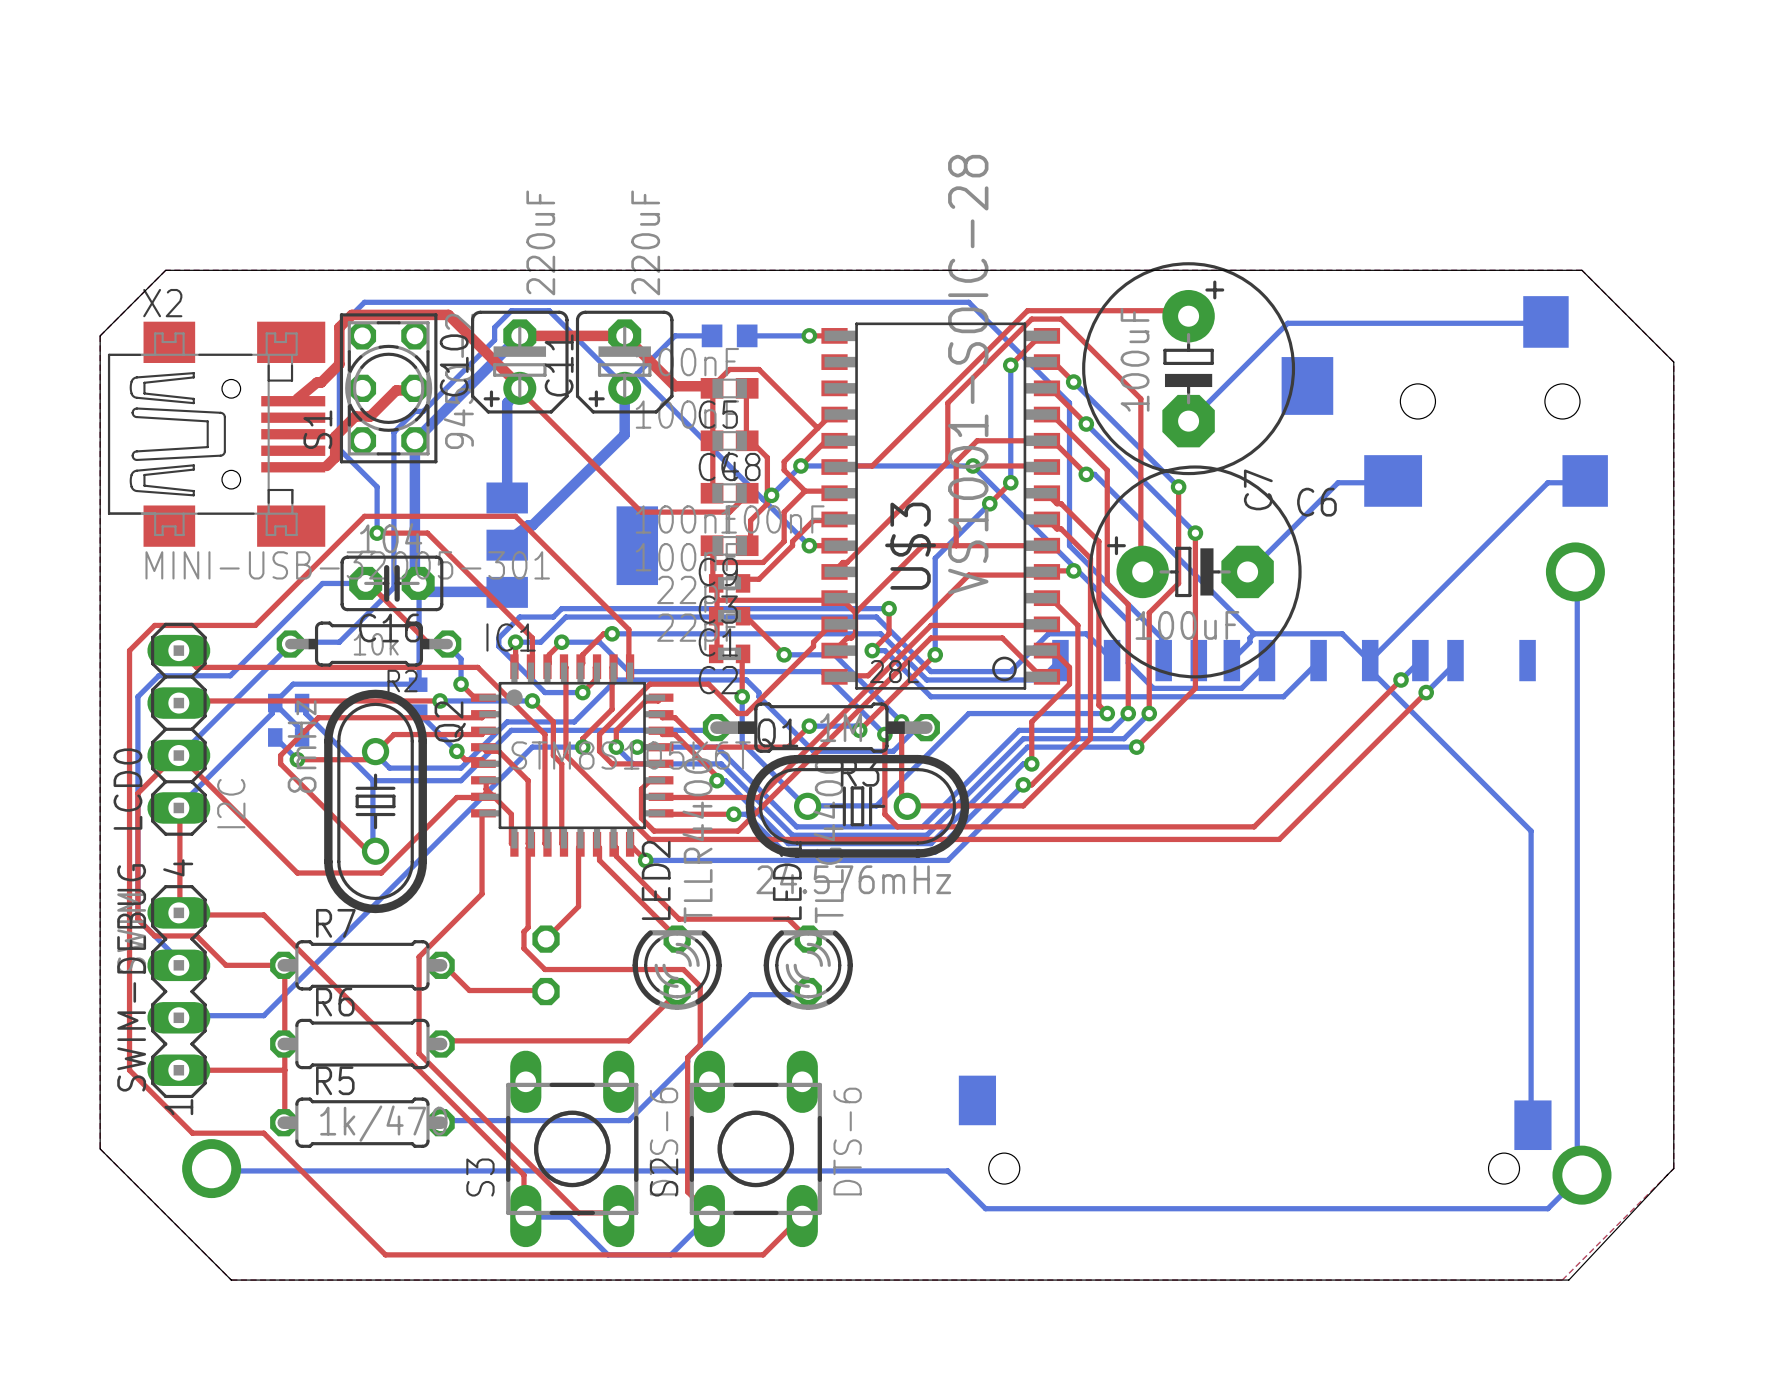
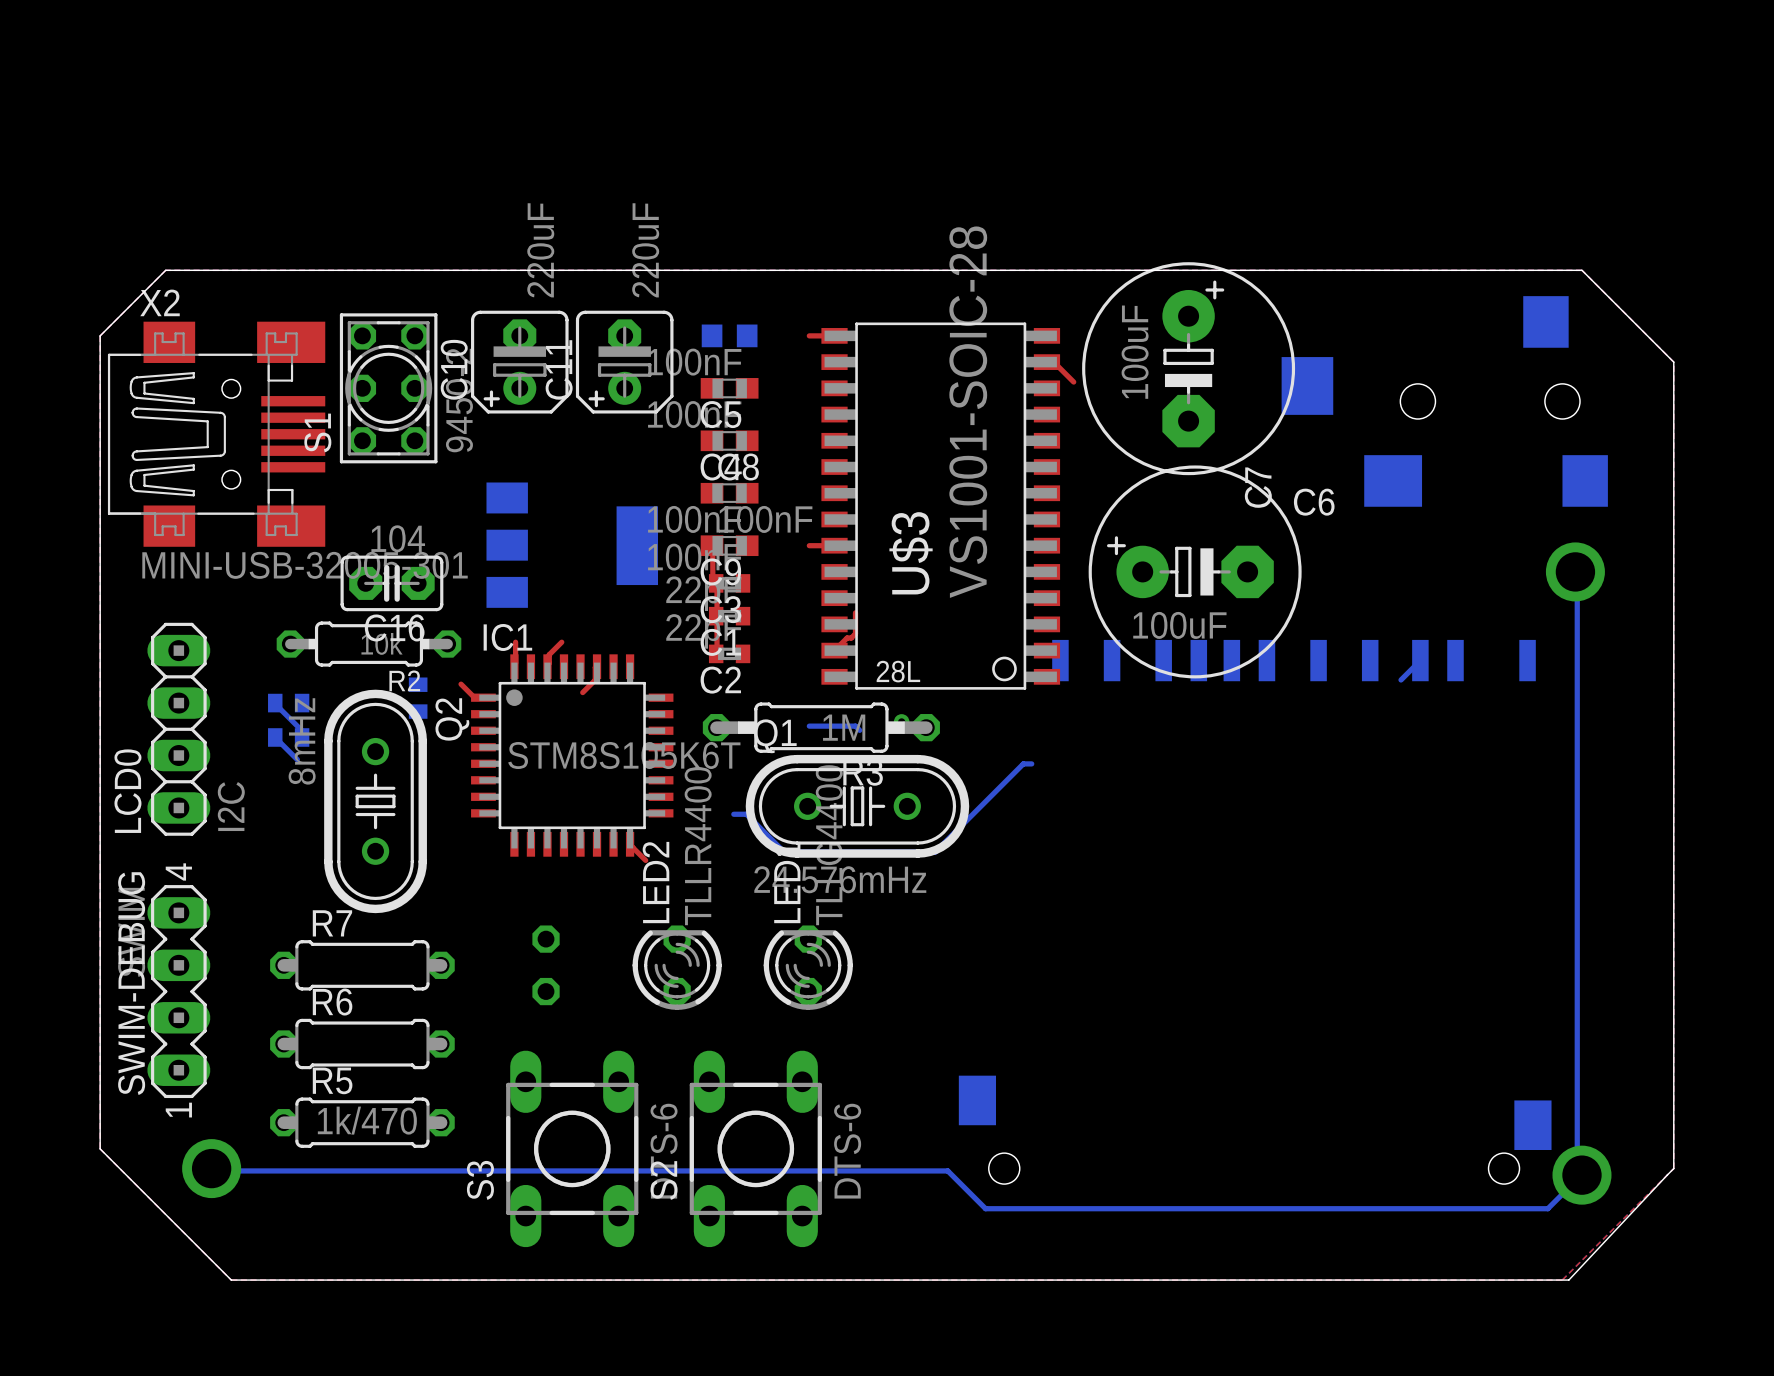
top track: (1188, 316) (1182, 310) (1027, 310) (872, 465) (834, 467) -> none
bottom track: (1545, 321) (1287, 323) (1188, 421) -> none
top track: (519, 335) (624, 335) (675, 386) (708, 386) (712, 388) -> none
bottom track: (519, 335) (414, 440) (414, 579) (418, 583) -> none
bottom track: (712, 335) (675, 335) (624, 386) -> none
bottom track: (747, 335) (809, 335) -> none
via: (809, 335) -> none
top track: (1046, 335) (1040, 335) (1010, 365) -> none
bottom track: (1010, 365) (1010, 482) -> none
via: (1010, 365) -> none
bottom track: (637, 373) (809, 545) -> none
bottom track: (1073, 382) (1178, 486) -> none
via: (1073, 382) -> none
bottom track: (624, 386) (549, 310) (511, 310) (494, 327) (494, 340) (423, 411) (414, 411) (393, 432) (393, 587) (339, 642) (293, 642) (290, 644) (178, 755) -> none
bottom track: (624, 386) (624, 434) (532, 525) (528, 525) (507, 541) (507, 545) -> none
top track: (414, 388) (414, 390) (396, 390) (370, 416) (355, 416) (335, 436) (335, 457) (326, 465) (293, 467) -> none
bottom track: (519, 388) (507, 403) (507, 497) -> none
top track: (712, 388) (712, 493) -> none
top track: (712, 388) (729, 369) (758, 369) (817, 428) -> none
top track: (747, 388) (746, 440) (750, 440) (767, 457) (767, 503) (750, 520) (750, 545) (747, 545) -> none
top track: (1046, 388) (1048, 386) (1086, 424) -> none
top track: (293, 401) (316, 382) (321, 382) (339, 364) (339, 327) (351, 314) (448, 314) (519, 386) (519, 390) (641, 512) (729, 512) (747, 493) -> none
top track: (834, 414) (834, 411) (784, 461) (784, 470) (805, 491) -> none
top track: (1046, 414) (1048, 411) (1107, 470) (1107, 583) (1128, 604) (1128, 713) -> none
bottom track: (1086, 424) (1195, 533) -> none
via: (1086, 424) -> none
top track: (834, 440) (826, 440) (800, 465) -> none
via: (800, 465) -> none
top track: (972, 465) (1046, 467) -> none
via: (972, 465) -> none
top track: (1086, 474) (1052, 440) (977, 440) (956, 461) (956, 545) -> none
bottom track: (1086, 474) (1094, 474) (1254, 633) -> none
via: (1086, 474) -> none
bottom track: (1393, 480) (1392, 482) (1338, 482) (1247, 571) -> none
bottom track: (1585, 480) (1581, 482) (1547, 482) (1370, 660) -> none
top track: (1010, 482) (989, 503) -> none
via: (1010, 482) -> none
top track: (1178, 486) (1178, 583) (1149, 612) (1149, 713) -> none
via: (1178, 486) -> none
top track: (805, 491) (834, 491) (834, 493) -> none
top track: (805, 491) (784, 512) (784, 541) (763, 562) (712, 562) -> none
top track: (1046, 493) (1056, 503) (1061, 503) (1098, 541) (1098, 705) (1107, 713) -> none
via: (771, 495) -> none
bottom track: (763, 499) (767, 499) (800, 465) (972, 465) (1128, 621) (1128, 663) (1153, 688) (1241, 688) (1266, 663) (1266, 660) -> none
bottom track: (989, 503) (935, 558) (935, 654) -> none
via: (989, 503) -> none
top track: (834, 519) (813, 520) (792, 541) (792, 545) (758, 579) (746, 579) (743, 583) -> none
top track: (1046, 519) (1056, 528) (1061, 528) (1090, 558) (1090, 738) (1023, 805) (907, 806) (901, 801) (901, 721) -> none
top track: (377, 533) (427, 533) (532, 638) (530, 666) -> none
bottom track: (377, 533) (377, 486) (339, 449) (339, 327) (364, 302) (968, 302) (1069, 403) (1069, 545) (1161, 638) (1161, 659) (1163, 660) -> none
via: (377, 533) -> none
top track: (1195, 533) (1195, 688) (1136, 747) -> none
via: (1195, 533) -> none
via: (809, 545) -> none
top track: (1046, 545) (922, 545) (855, 612) (842, 600) (717, 600) -> none
top track: (1073, 570) (1048, 570) (1044, 575) (968, 575) (868, 675) (834, 676) -> none
via: (1073, 570) -> none
top track: (834, 571) (842, 562) (847, 562) (947, 461) (947, 403) (1031, 319) (1061, 319) (1140, 398) (1140, 570) (1142, 571) -> none
top track: (365, 583) (368, 583) (427, 642) (444, 642) (447, 644) -> none
bottom track: (365, 583) (322, 583) (230, 675) (158, 675) (137, 696) (137, 919) (175, 956) (175, 965) (178, 965) -> none
bottom track: (418, 583) (419, 684) (293, 684) (272, 705) (272, 713) (178, 807) -> none
bottom track: (418, 583) (419, 591) (507, 592) -> none
top track: (1046, 598) (1048, 596) (1077, 625) (1077, 738) (1031, 784) (1023, 784) -> none
top track: (889, 608) (889, 633) (872, 650) -> none
bottom track: (889, 608) (561, 608) (553, 617) (519, 617) (498, 638) (498, 646) (544, 692) (582, 692) -> none
via: (889, 608) -> none
top track: (743, 616) (746, 617) (784, 654) -> none
top track: (834, 624) (834, 621) (813, 642) (813, 646) (746, 713) (738, 713) (708, 684) (649, 684) (599, 734) (599, 751) (612, 763) (661, 763) -> none
top track: (1046, 624) (931, 625) (758, 797) (661, 796) -> none
top track: (612, 633) (603, 633) (582, 654) (582, 663) (580, 666) -> none
bottom track: (612, 633) (880, 633) (926, 679) (1040, 679) (1060, 660) -> none
via: (612, 633) -> none
bottom track: (1254, 633) (1249, 638) (1249, 642) (1231, 660) -> none
bottom track: (1254, 633) (1342, 633) (1370, 660) -> none
bottom track: (515, 642) (540, 642) (565, 617) (876, 617) (931, 671) (1010, 671) (1048, 633) (1086, 633) (1112, 660) -> none
via: (515, 642) -> none
bottom track: (561, 642) (599, 642) (628, 671) (821, 671) (884, 734) -> none
via: (561, 642) -> none
bottom track: (447, 644) (461, 659) (461, 684) -> none
top track: (178, 650) (196, 667) (477, 667) (544, 734) (544, 843) (547, 844) -> none
bottom track: (872, 650) (884, 650) (931, 696) (1283, 696) (1318, 660) -> none
via: (872, 650) -> none
top track: (1046, 650) (1052, 650) (1069, 667) (1069, 684) (1031, 721) (1031, 763) -> none
top track: (743, 653) (742, 696) -> none
bottom track: (784, 654) (834, 654) (901, 721) -> none
via: (784, 654) -> none
top track: (935, 654) (859, 730) -> none
via: (935, 654) -> none
bottom track: (1370, 660) (1371, 671) (1531, 831) (1531, 1124) (1532, 1125) -> none
bottom track: (1455, 660) (1455, 663) (1426, 692) -> none
top track: (563, 666) (565, 667) (565, 755) (649, 839) (1279, 839) (1426, 692) -> none
top track: (613, 666) (612, 709) (582, 738) (582, 747) -> none
top track: (630, 666) (628, 629) (515, 516) (364, 516) (255, 625) (154, 625) (129, 650) (129, 1070) (192, 1133) (263, 1133) (385, 1254) (763, 1254) (802, 1216) -> none
top track: (1046, 676) (1044, 679) (1002, 638) (931, 638) (738, 831) (654, 831) (641, 818) (641, 789) (649, 780) (661, 780) -> none
top track: (1401, 679) (1254, 826) (897, 826) (884, 814) (884, 734) -> none
via: (1401, 679) -> none
via: (461, 684) -> none
via: (582, 692) -> none
via: (1426, 692) -> none
bottom track: (742, 696) (742, 742) (807, 806) (876, 805) (968, 713) (1107, 713) -> none
via: (742, 696) -> none
top track: (661, 697) (658, 700) (645, 700) (616, 730) (616, 747) -> none
top track: (440, 700) (179, 700) (178, 703) -> none
bottom track: (440, 700) (532, 700) -> none
via: (440, 700) -> none
top track: (532, 700) (553, 721) (553, 755) (561, 763) (561, 843) (563, 844) -> none
via: (532, 700) -> none
bottom track: (302, 703) (305, 705) (305, 713) (372, 780) -> none
bottom track: (418, 711) (456, 751) -> none
via: (1107, 713) -> none
bottom track: (1128, 713) (1111, 730) (1019, 730) (922, 826) (796, 826) (717, 747) (637, 747) -> none
via: (1128, 713) -> none
bottom track: (1149, 713) (1124, 738) (1023, 738) (926, 835) (792, 835) (721, 763) (633, 763) (616, 747) -> none
via: (1149, 713) -> none
top track: (483, 714) (482, 717) (318, 717) (280, 755) (280, 763) (364, 847) (372, 847) (375, 851) -> none
top track: (661, 714) (662, 717) (675, 717) (704, 747) (788, 747) (809, 726) -> none
via: (809, 726) -> none
bottom track: (716, 727) (712, 730) (511, 730) (461, 780) (372, 780) -> none
bottom track: (926, 727) (922, 730) (914, 730) (893, 751) (813, 751) (758, 696) (758, 692) (746, 679) (616, 679) (574, 721) (507, 721) (461, 768) (389, 768) (375, 751) -> none
top track: (483, 730) (482, 734) (393, 734) (368, 759) (297, 759) -> none
top track: (661, 730) (662, 734) (675, 734) (717, 776) (717, 780) -> none
via: (859, 730) -> none
via: (884, 734) -> none
top track: (483, 747) (486, 751) (498, 751) (528, 780) (528, 843) (530, 844) (528, 847) (528, 927) (523, 931) (523, 948) (544, 969) (683, 969) (700, 986) (700, 1045) (687, 1057) (687, 1191) (708, 1212) (709, 1216) -> none
bottom track: (582, 747) (532, 747) (263, 1015) (179, 1015) (178, 1017) -> none
via: (582, 747) -> none
via: (616, 747) -> none
via: (637, 747) -> none
bottom track: (1136, 747) (1027, 747) (931, 843) (788, 843) (725, 780) (717, 780) -> none
via: (1136, 747) -> none
top track: (456, 751) (465, 759) (482, 759) (483, 763) -> none
via: (456, 751) -> none
via: (297, 759) -> none
via: (1031, 763) -> none
bottom track: (372, 780) (372, 847) (375, 851) -> none
top track: (483, 780) (486, 780) (486, 793) (483, 796) (456, 797) (381, 873) (297, 873) (179, 755) (175, 755) (137, 793) (137, 919) (154, 935) (196, 935) (226, 965) (284, 965) (283, 1122) -> none
via: (717, 780) -> none
bottom track: (1023, 784) (947, 860) (645, 860) -> none
via: (1023, 784) -> none
top track: (486, 789) (511, 814) (511, 843) (514, 844) -> none
top track: (178, 807) (179, 914) (263, 914) (523, 1175) (523, 1212) (525, 1216) -> none
top track: (483, 813) (482, 893) (419, 956) (419, 1053) (578, 1212) (616, 1212) (618, 1216) -> none
top track: (661, 813) (733, 814) -> none
via: (733, 814) -> none
top track: (580, 844) (578, 847) (578, 906) (546, 939) -> none
top track: (597, 844) (599, 847) (599, 860) (677, 939) -> none
top track: (613, 844) (616, 847) (616, 856) (679, 919) (788, 919) (808, 939) -> none
via: (645, 860) -> none
top track: (441, 965) (444, 965) (469, 990) (546, 991) -> none
top track: (677, 991) (628, 1040) (444, 1040) (441, 1044) -> none
bottom track: (808, 991) (805, 994) (750, 994) (687, 1057) (687, 1061) (628, 1120) (444, 1120) (441, 1122) -> none
top track: (178, 1070) (284, 1070) -> none
bottom track: (525, 1216) (570, 1217) (607, 1254) (670, 1254) (709, 1216) -> none

